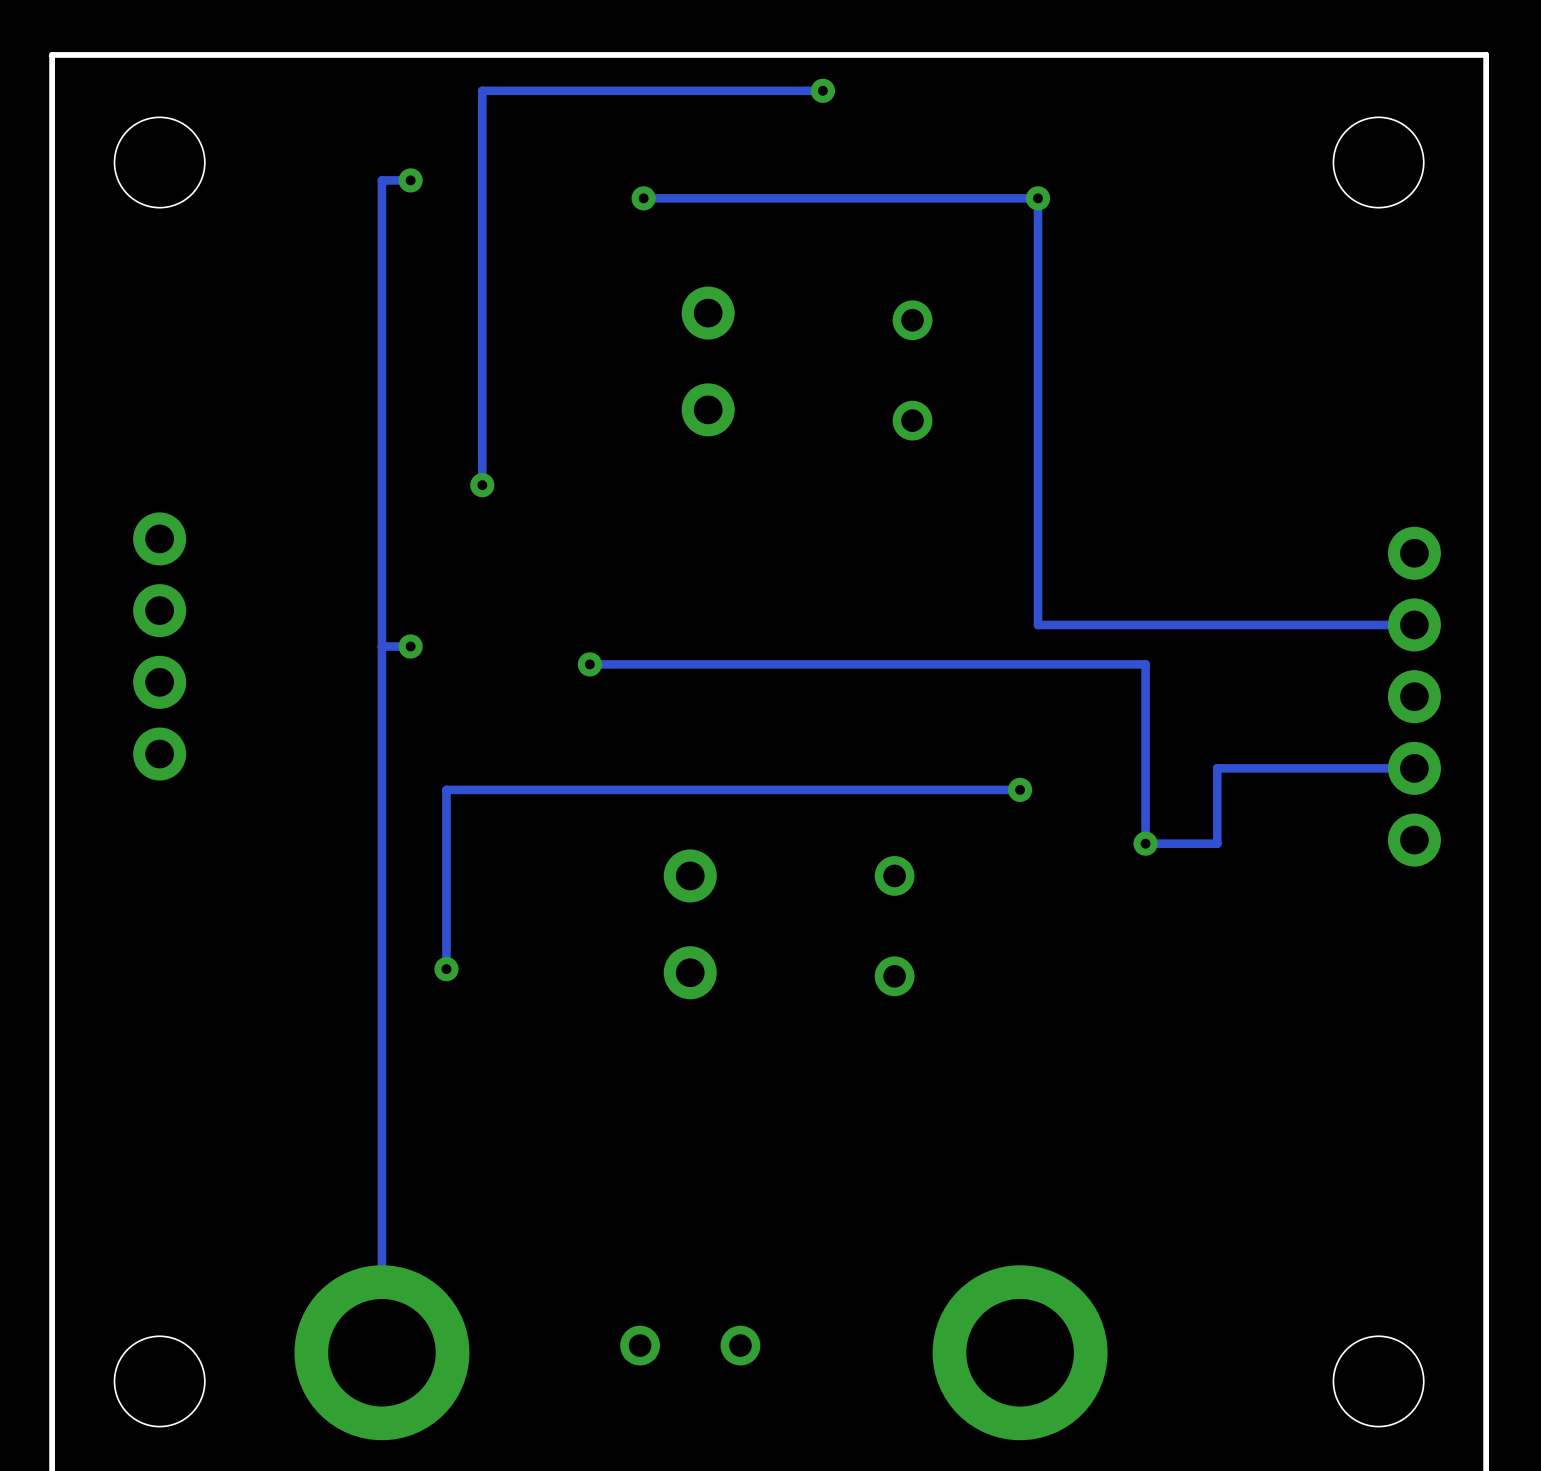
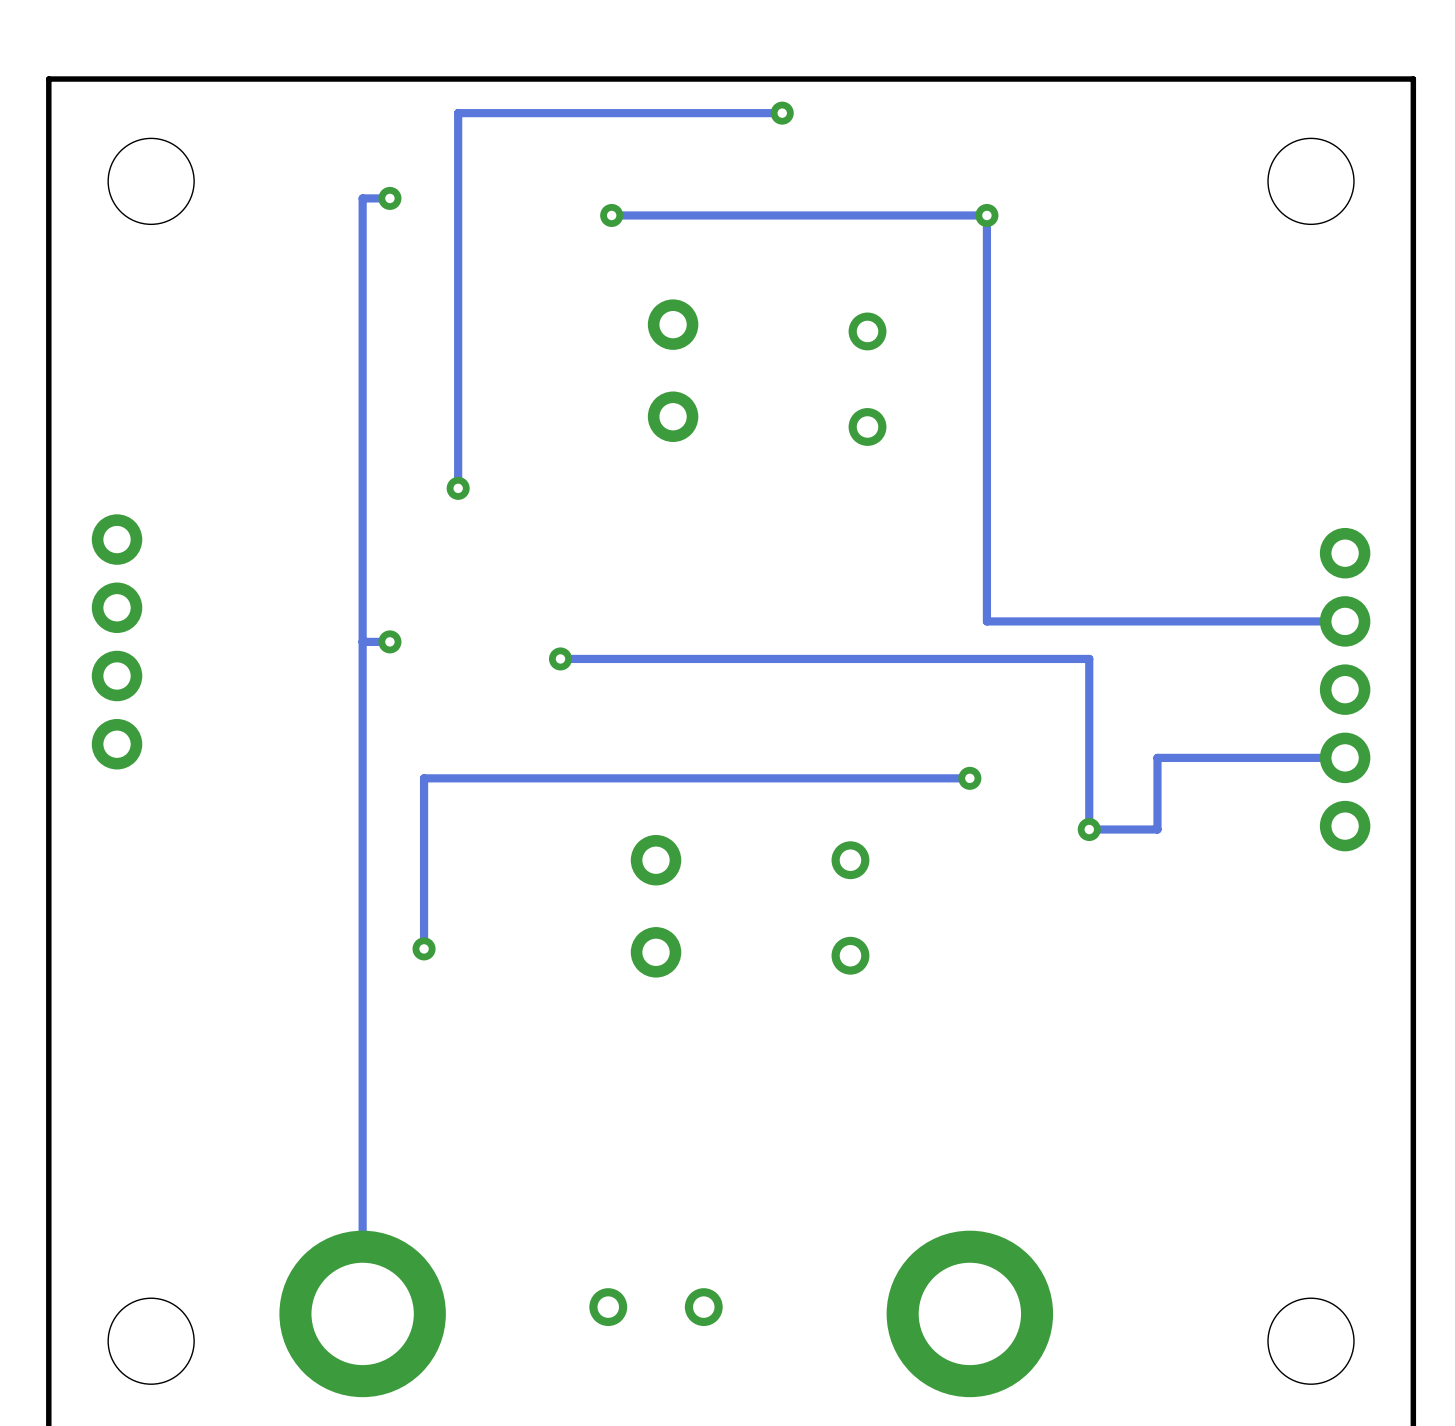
part position: (159, 646) -> (117, 641)

